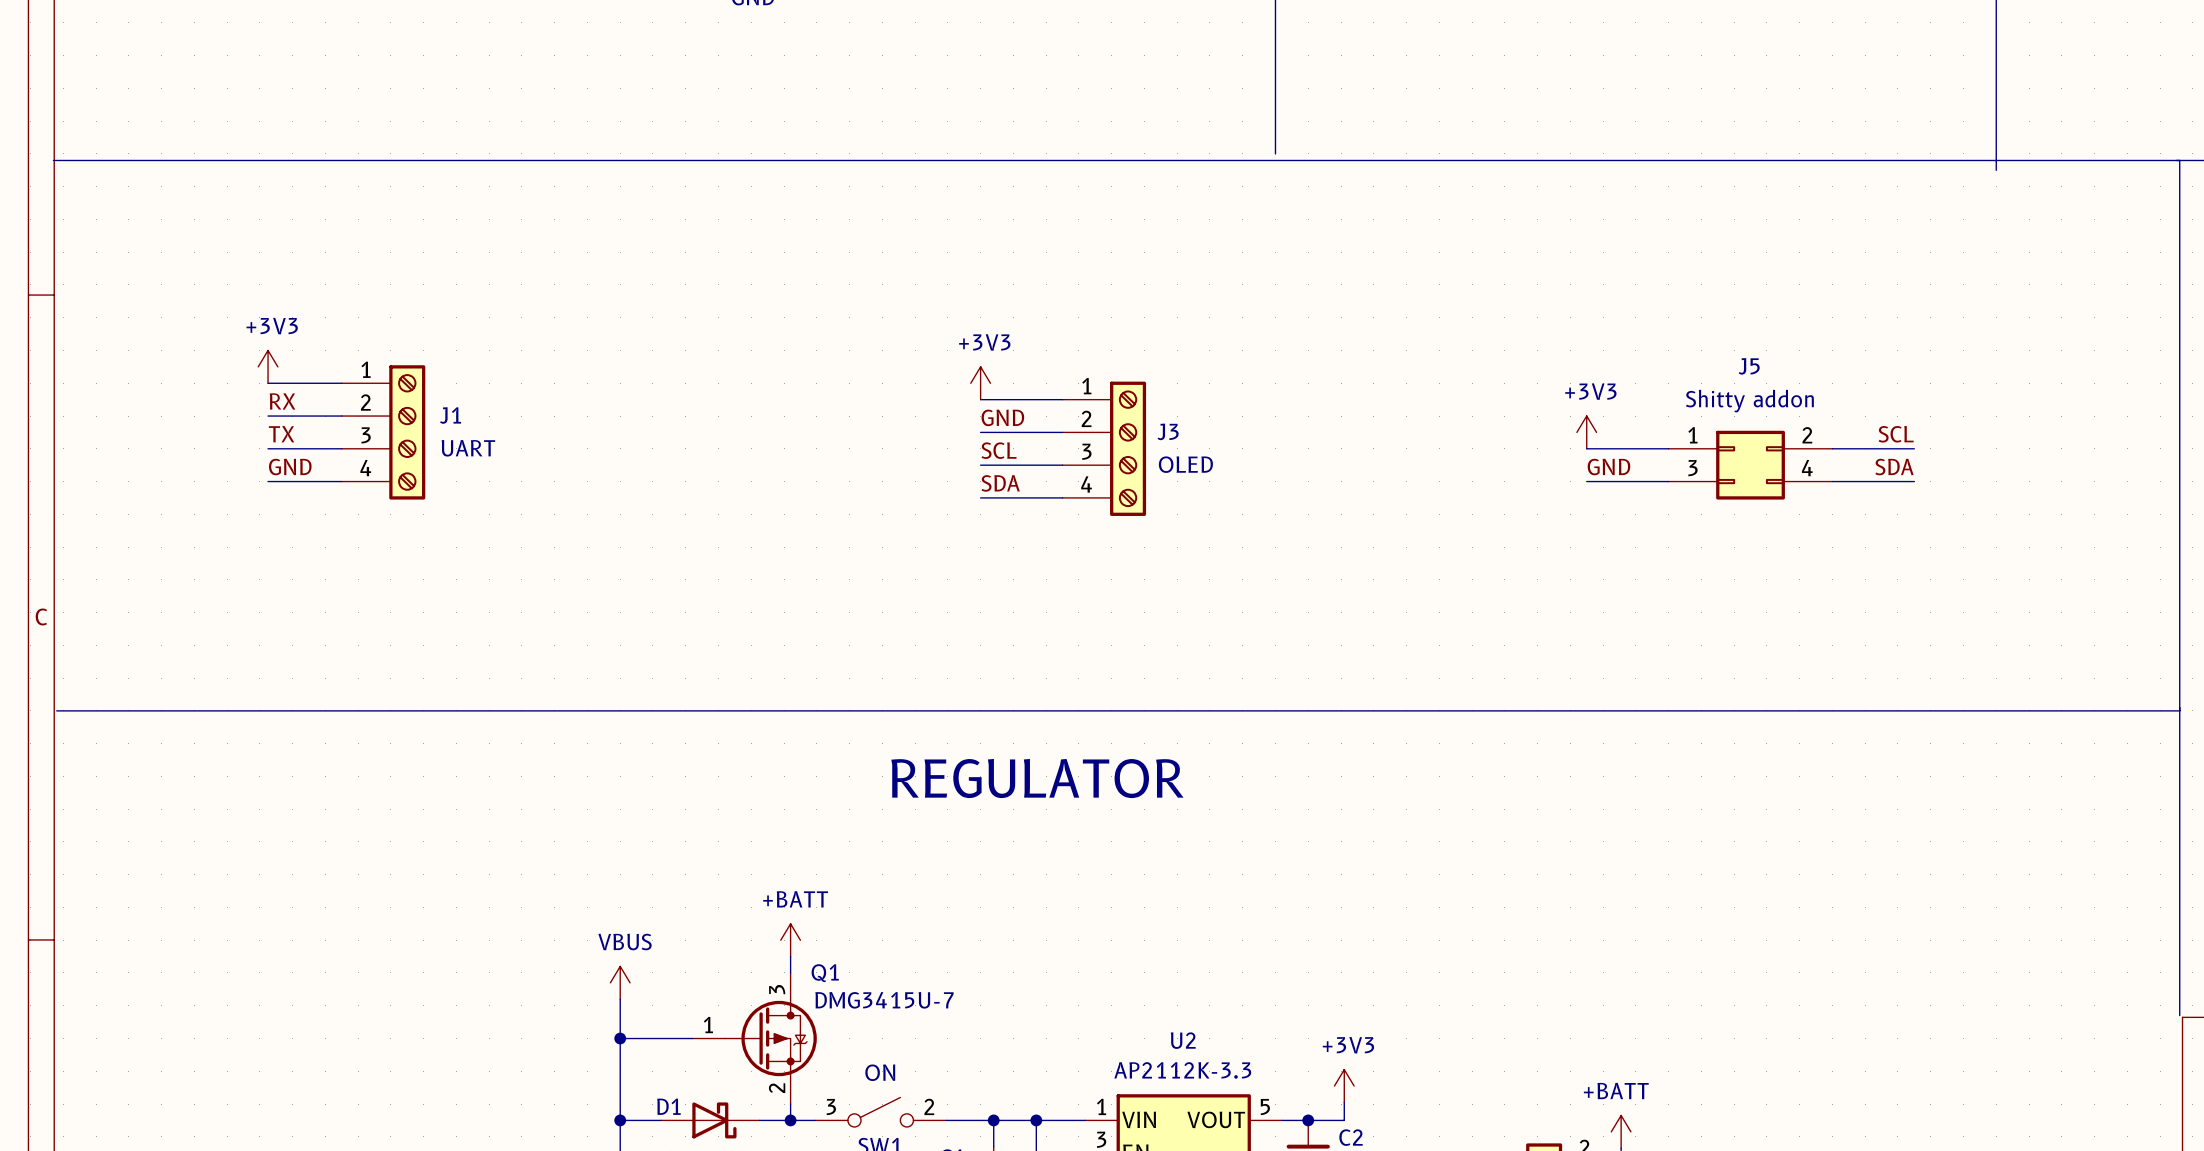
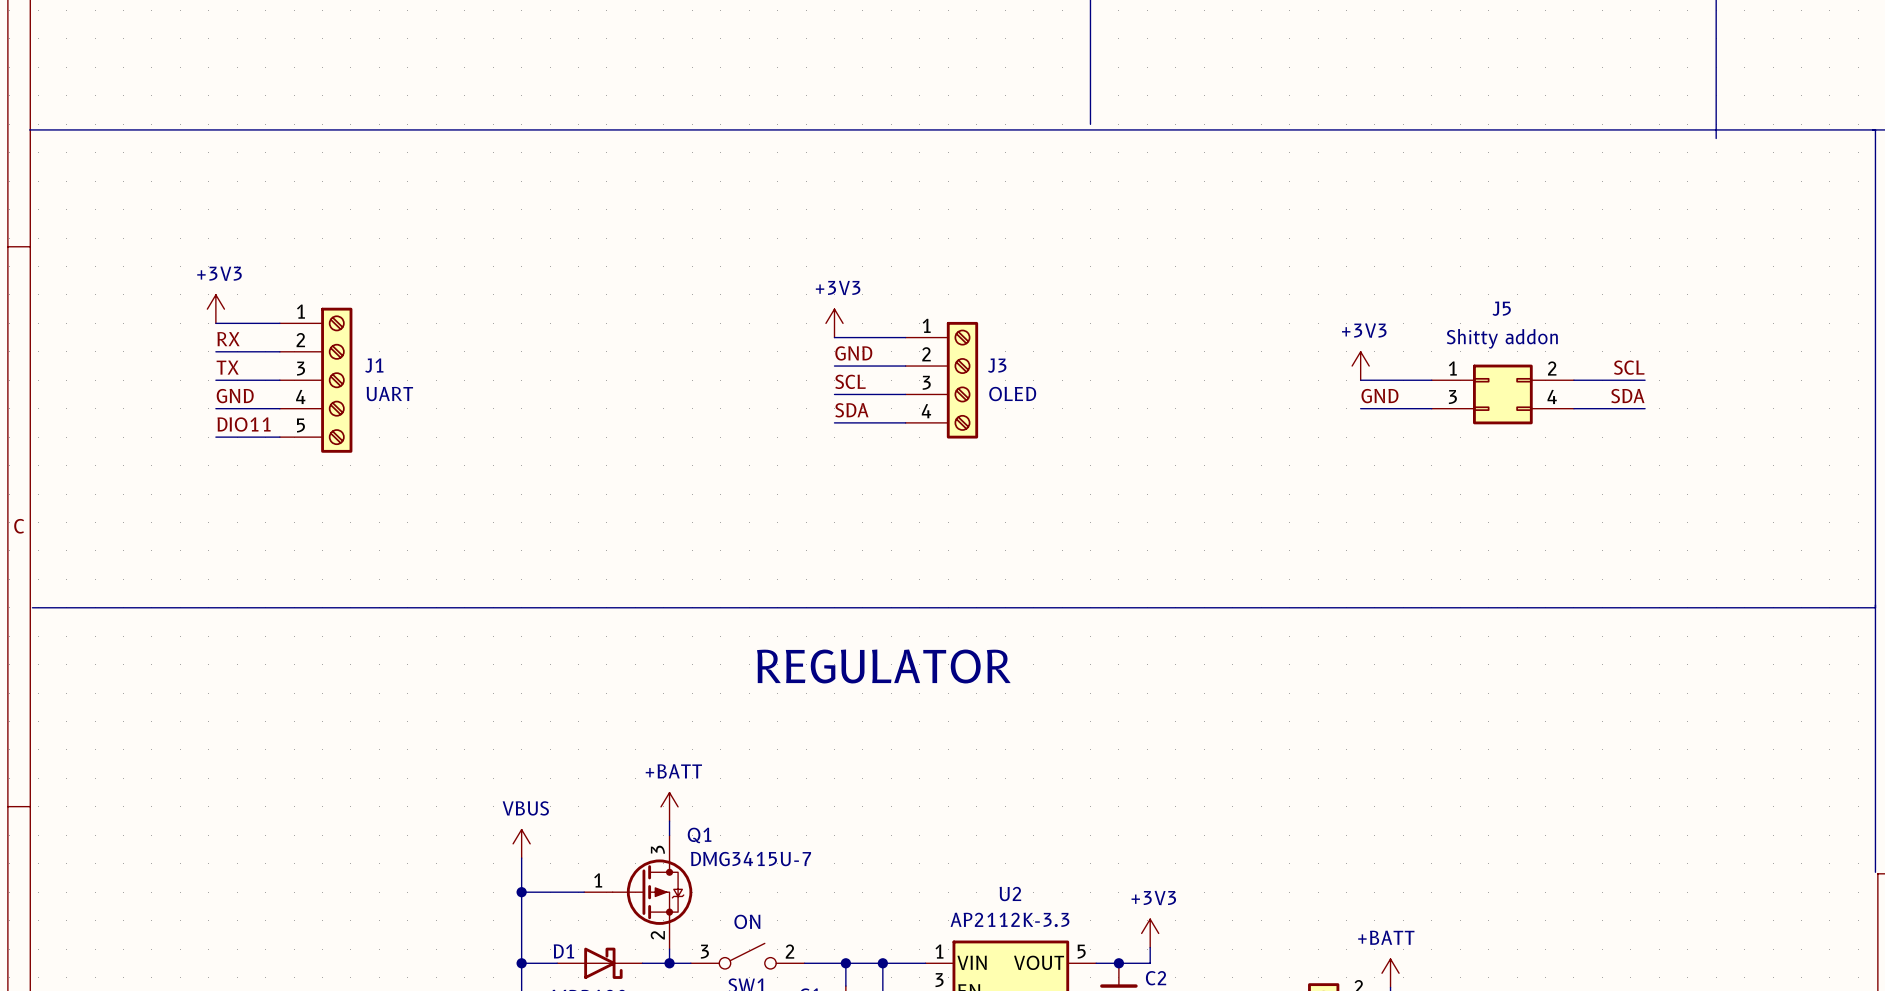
J1 symbol: [341, 365, 426, 500] -> [279, 307, 353, 453]
label: none -> DIO11 (244, 424)
wire: none -> (215, 437) (279, 437)

